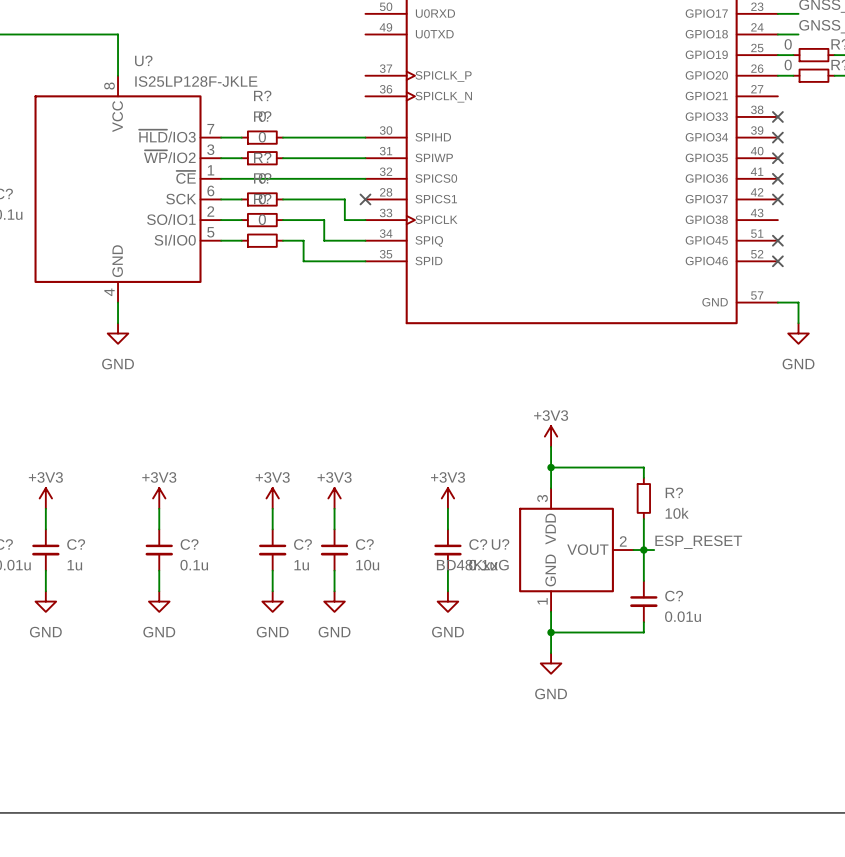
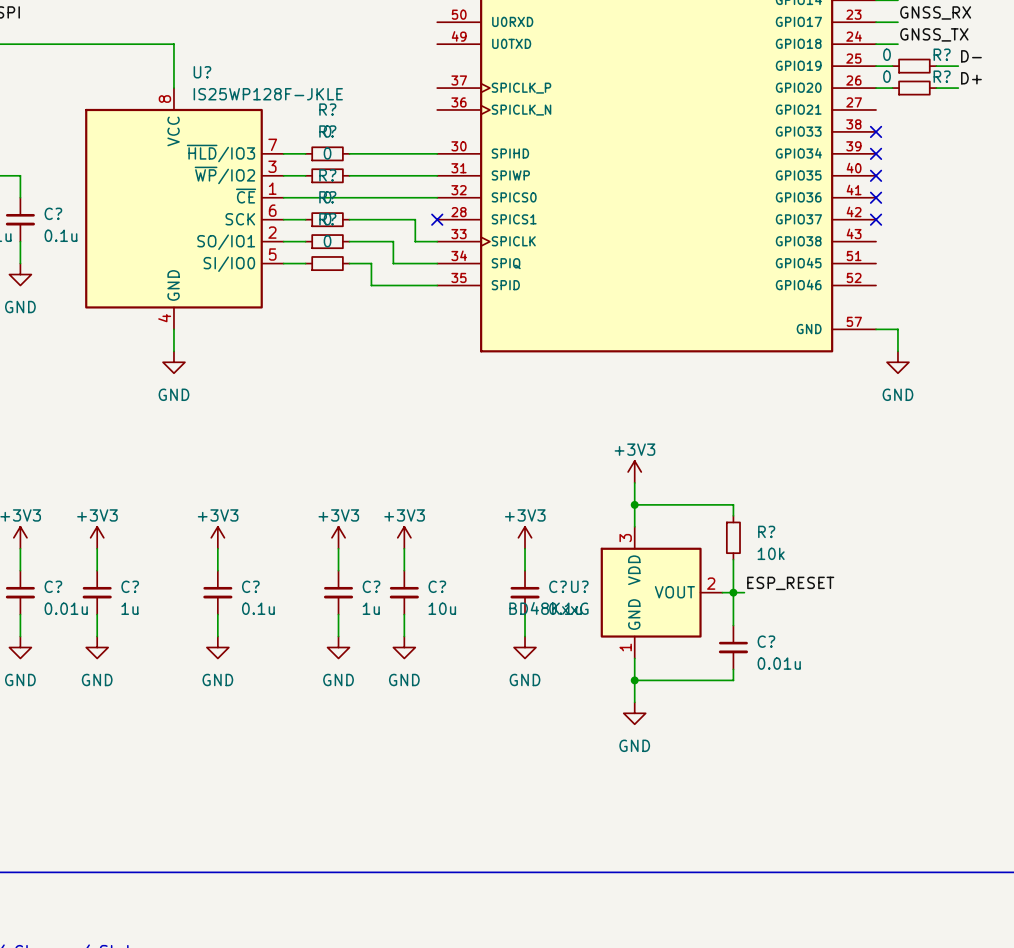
U? value: IS25LP128F-JKLE (196, 81) -> IS25WP128F-JKLE (268, 94)
no-connect mark: (777, 240) -> none
no-connect mark: (777, 261) -> none

